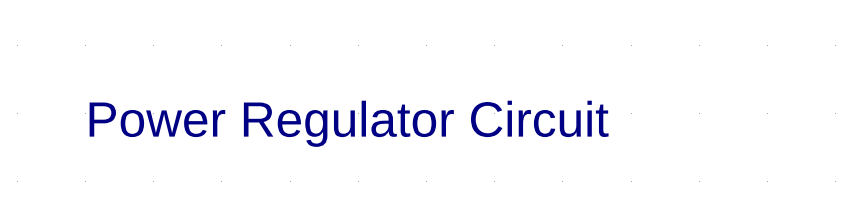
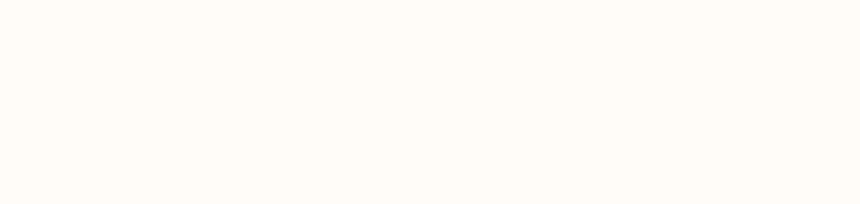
text: Power Regulator Circuit (349, 123) -> none

